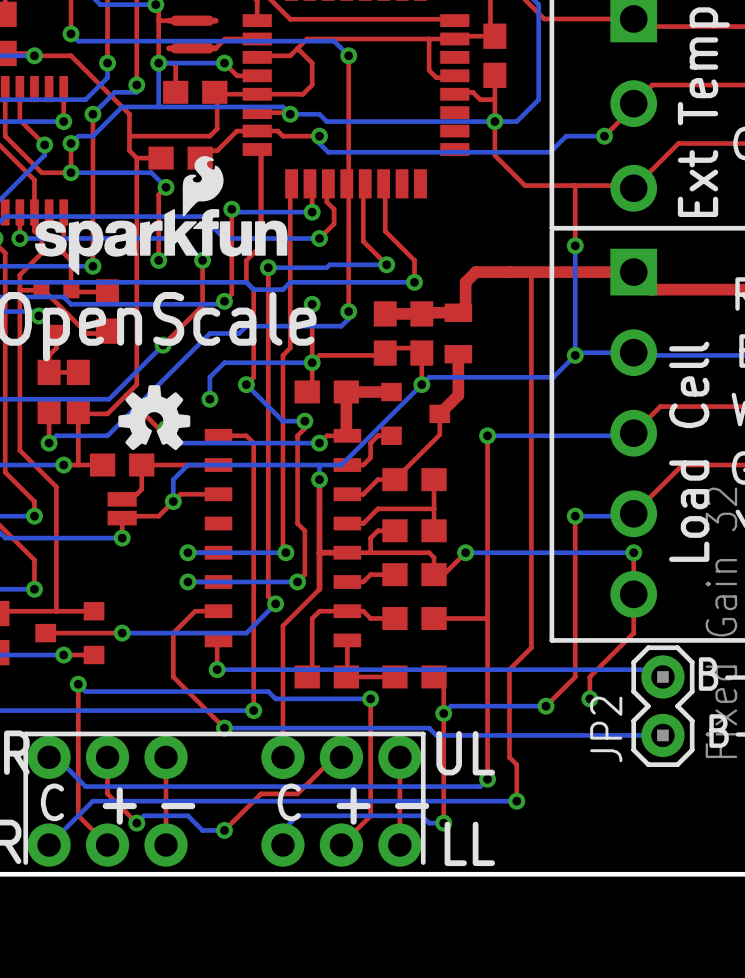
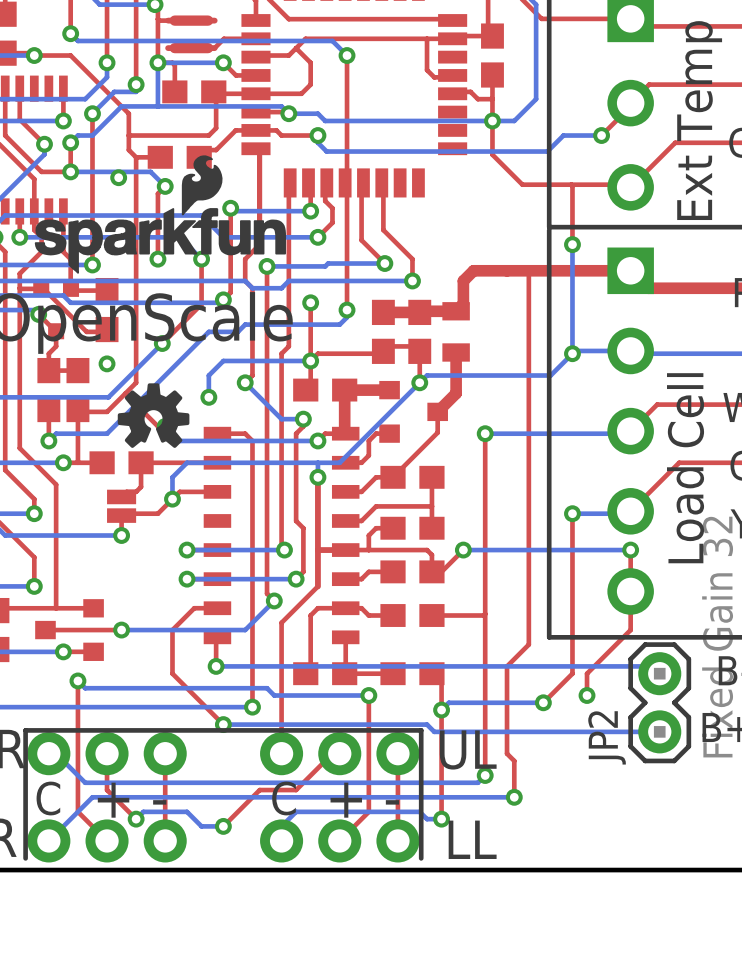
via: none -> (118, 177)
via: none -> (107, 363)

